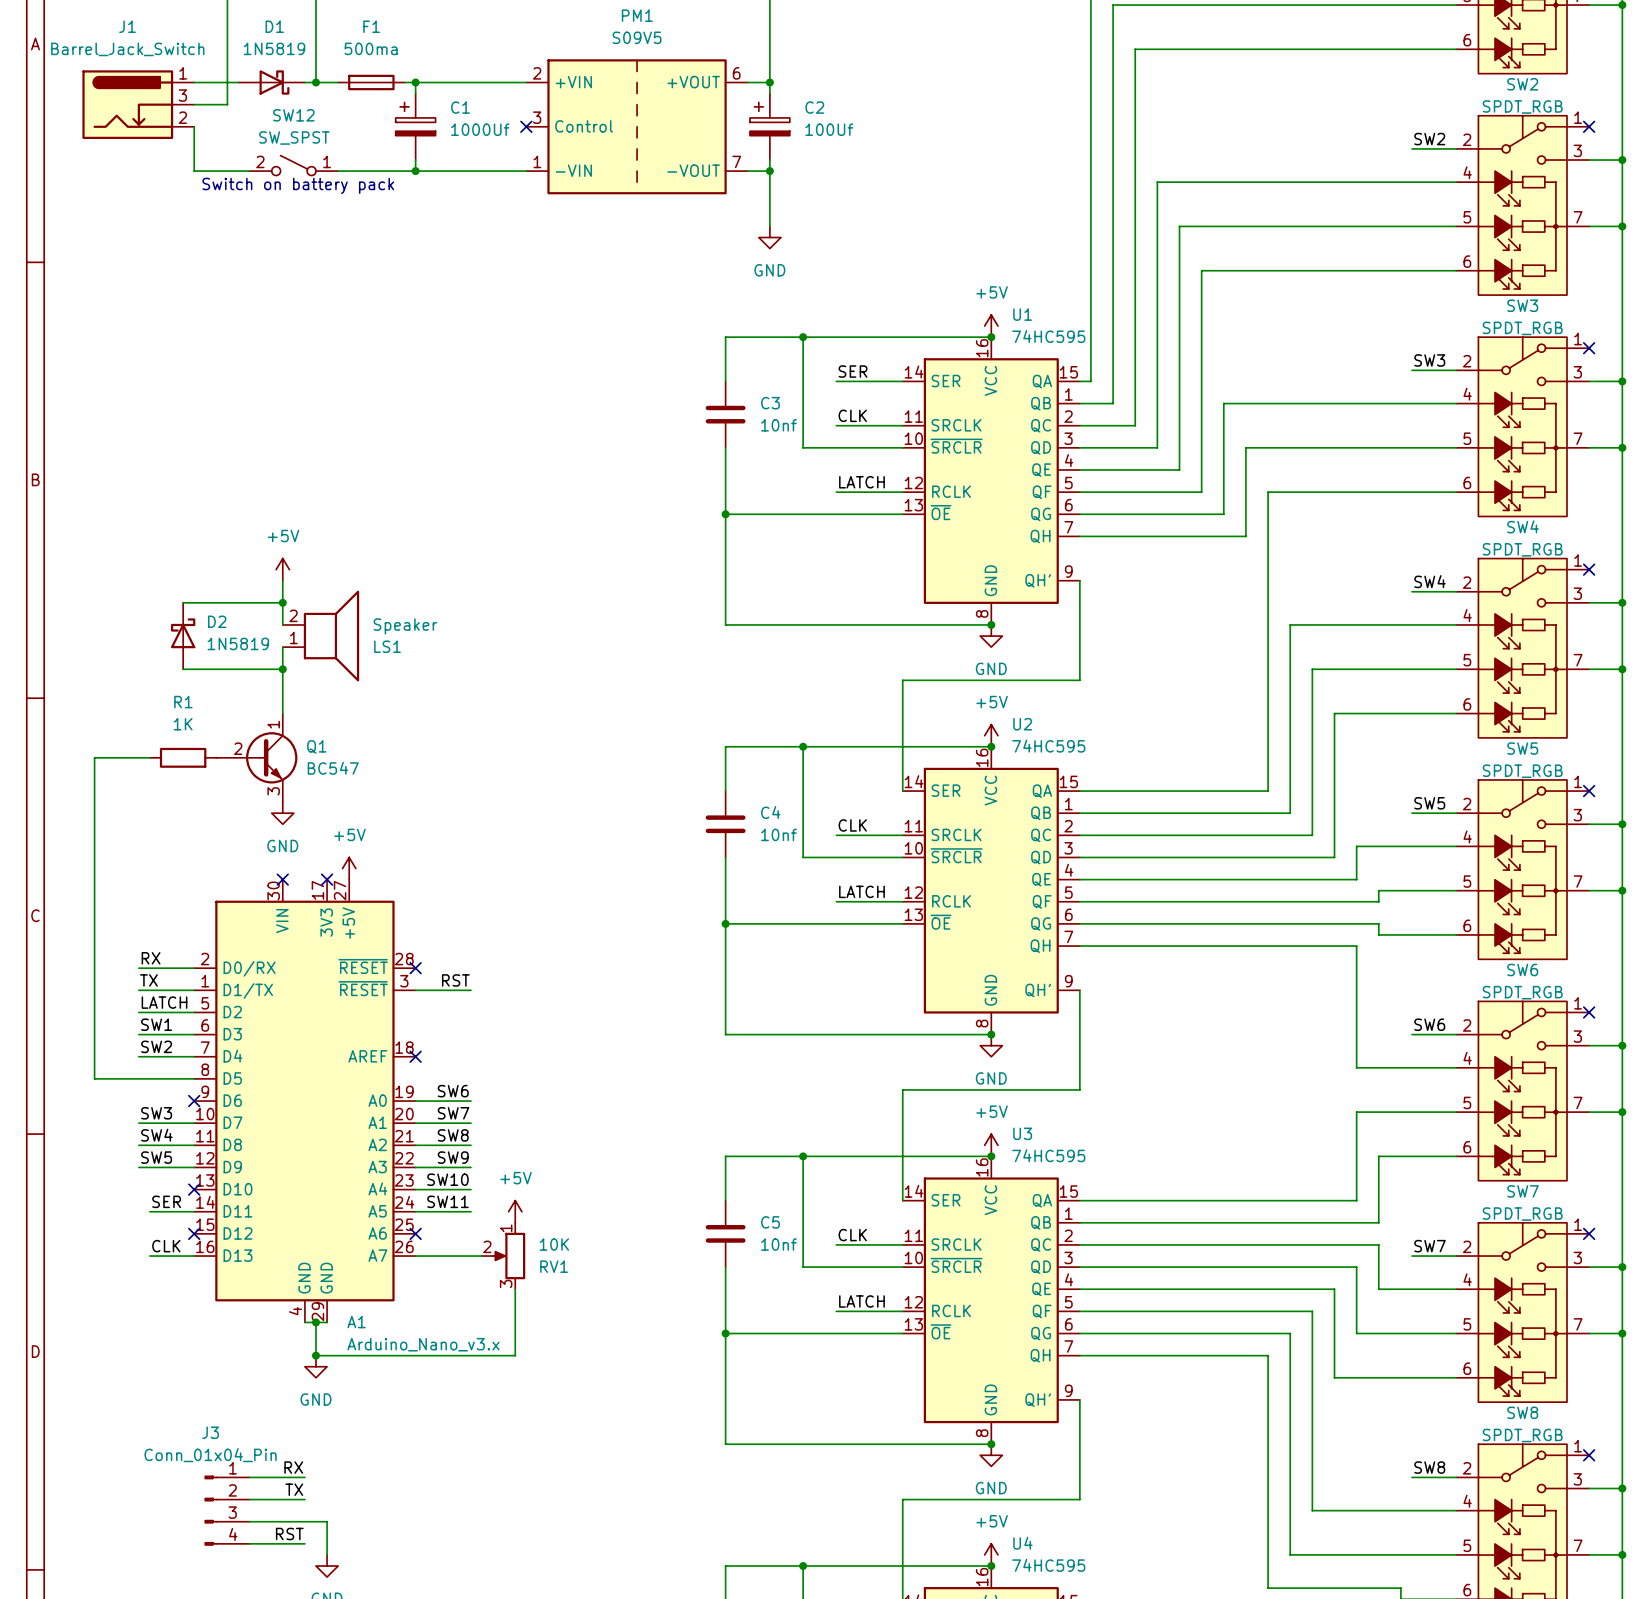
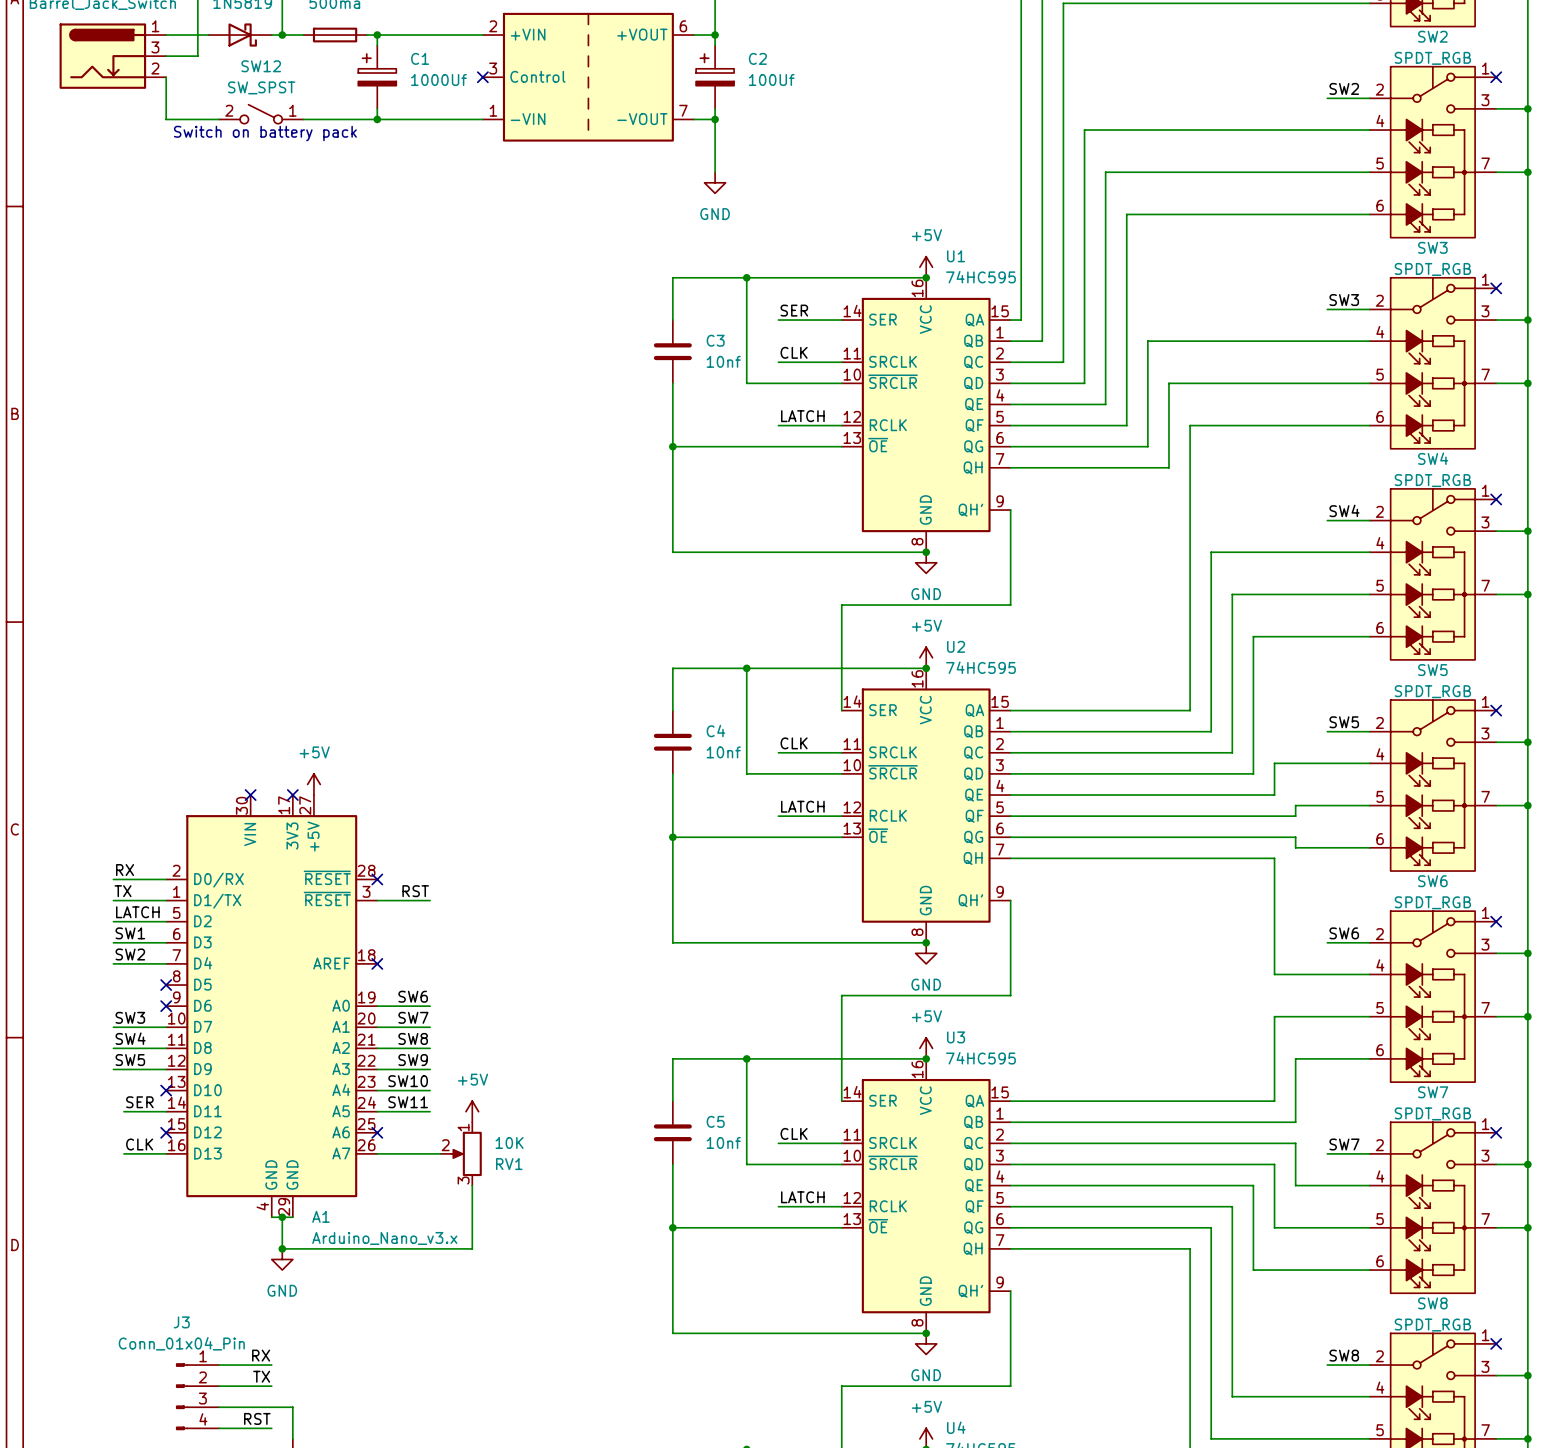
power symbol: +5V (282, 569) -> none
wire: (282, 580) (282, 624) -> none
wire: (183, 602) (282, 602) -> none
junction: (282, 602) -> none
D2: 1N5819 (183, 636) -> none
LS1: Speaker (320, 636) -> none
wire: (282, 647) (282, 713) -> none
wire: (183, 669) (282, 669) -> none
junction: (282, 669) -> none
wire: (149, 757) (94, 757) (94, 1078) (194, 1078) -> none
R1: 1K (183, 757) -> none
Q1: BC547 (256, 757) -> none
power symbol: GND (282, 813) -> none
no-connect mark: none -> (166, 985)

